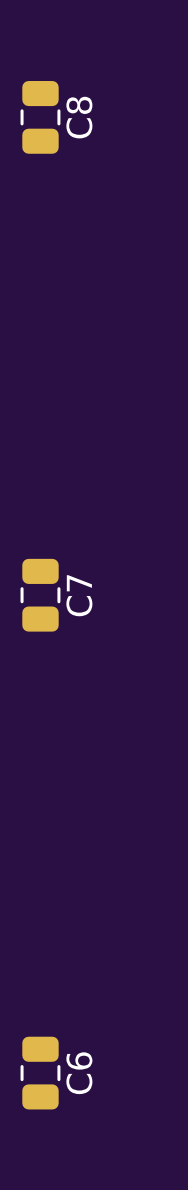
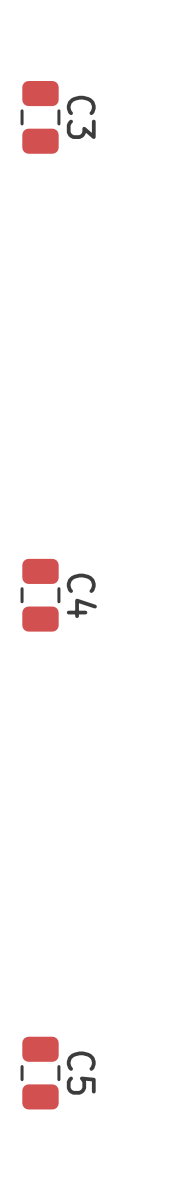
C8 name: C8 (79, 117) -> C3 (81, 117)
C7 name: C7 (79, 595) -> C4 (81, 595)
C6 name: C6 (79, 1073) -> C5 (81, 1073)

